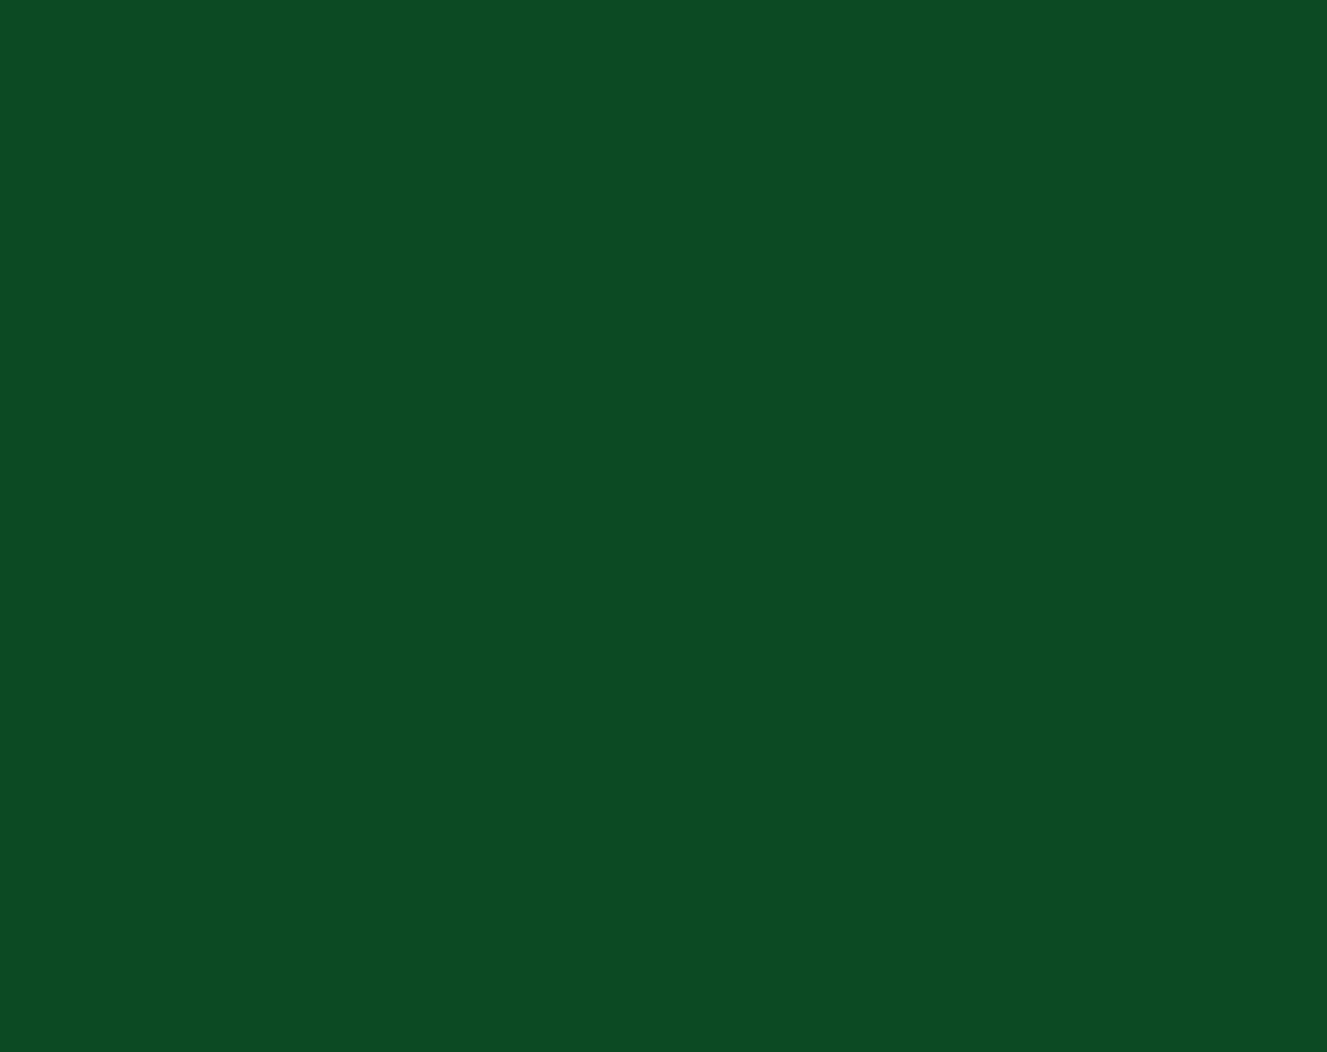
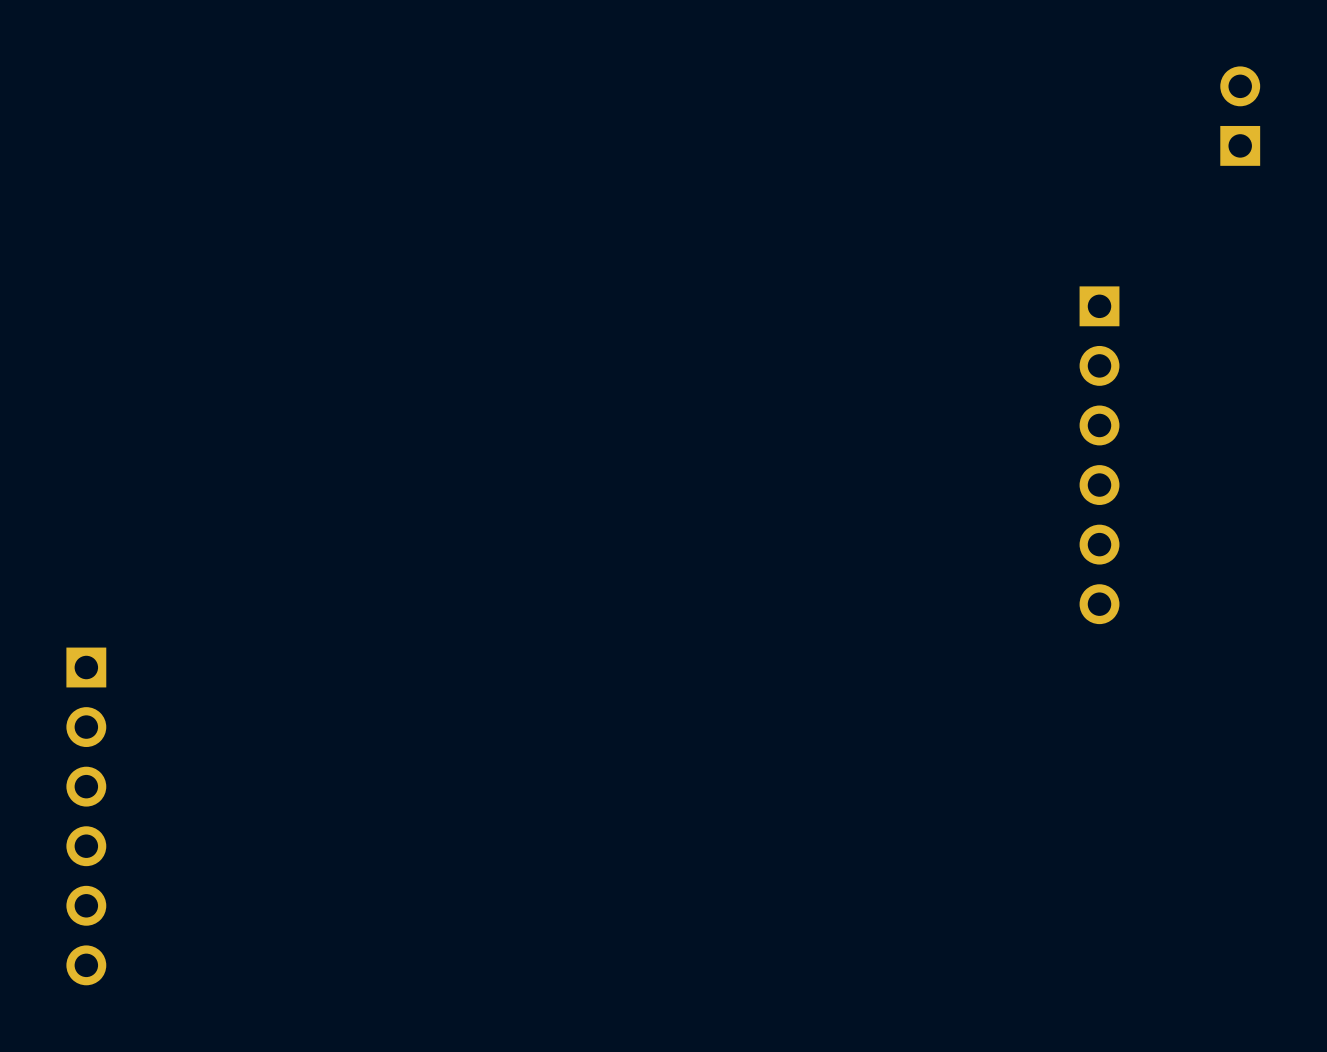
part: none -> (1240, 116)
part: none -> (1099, 455)
part: none -> (86, 816)

